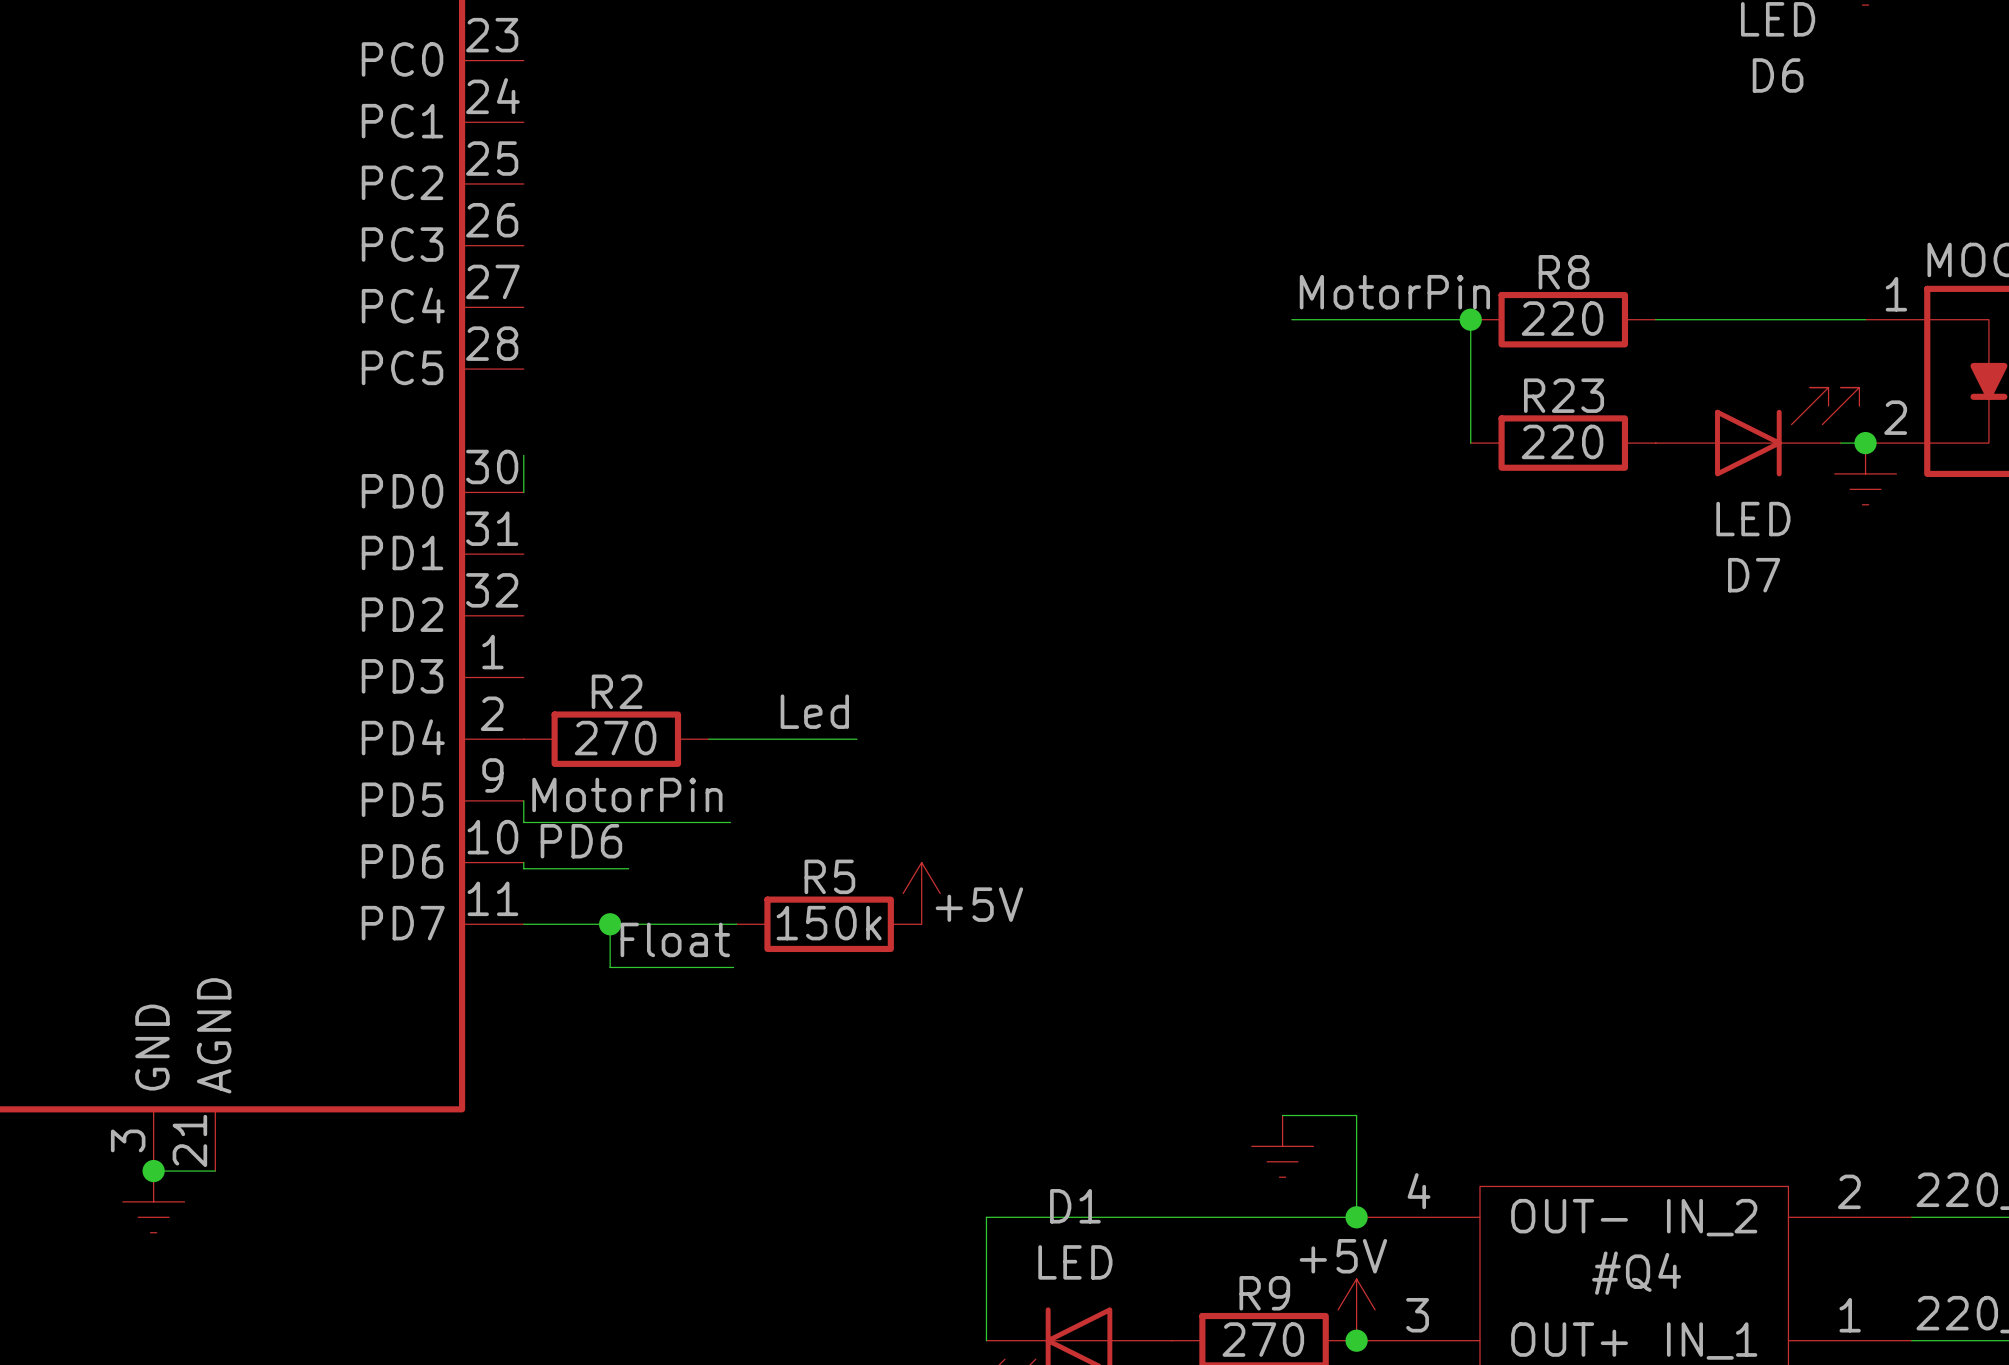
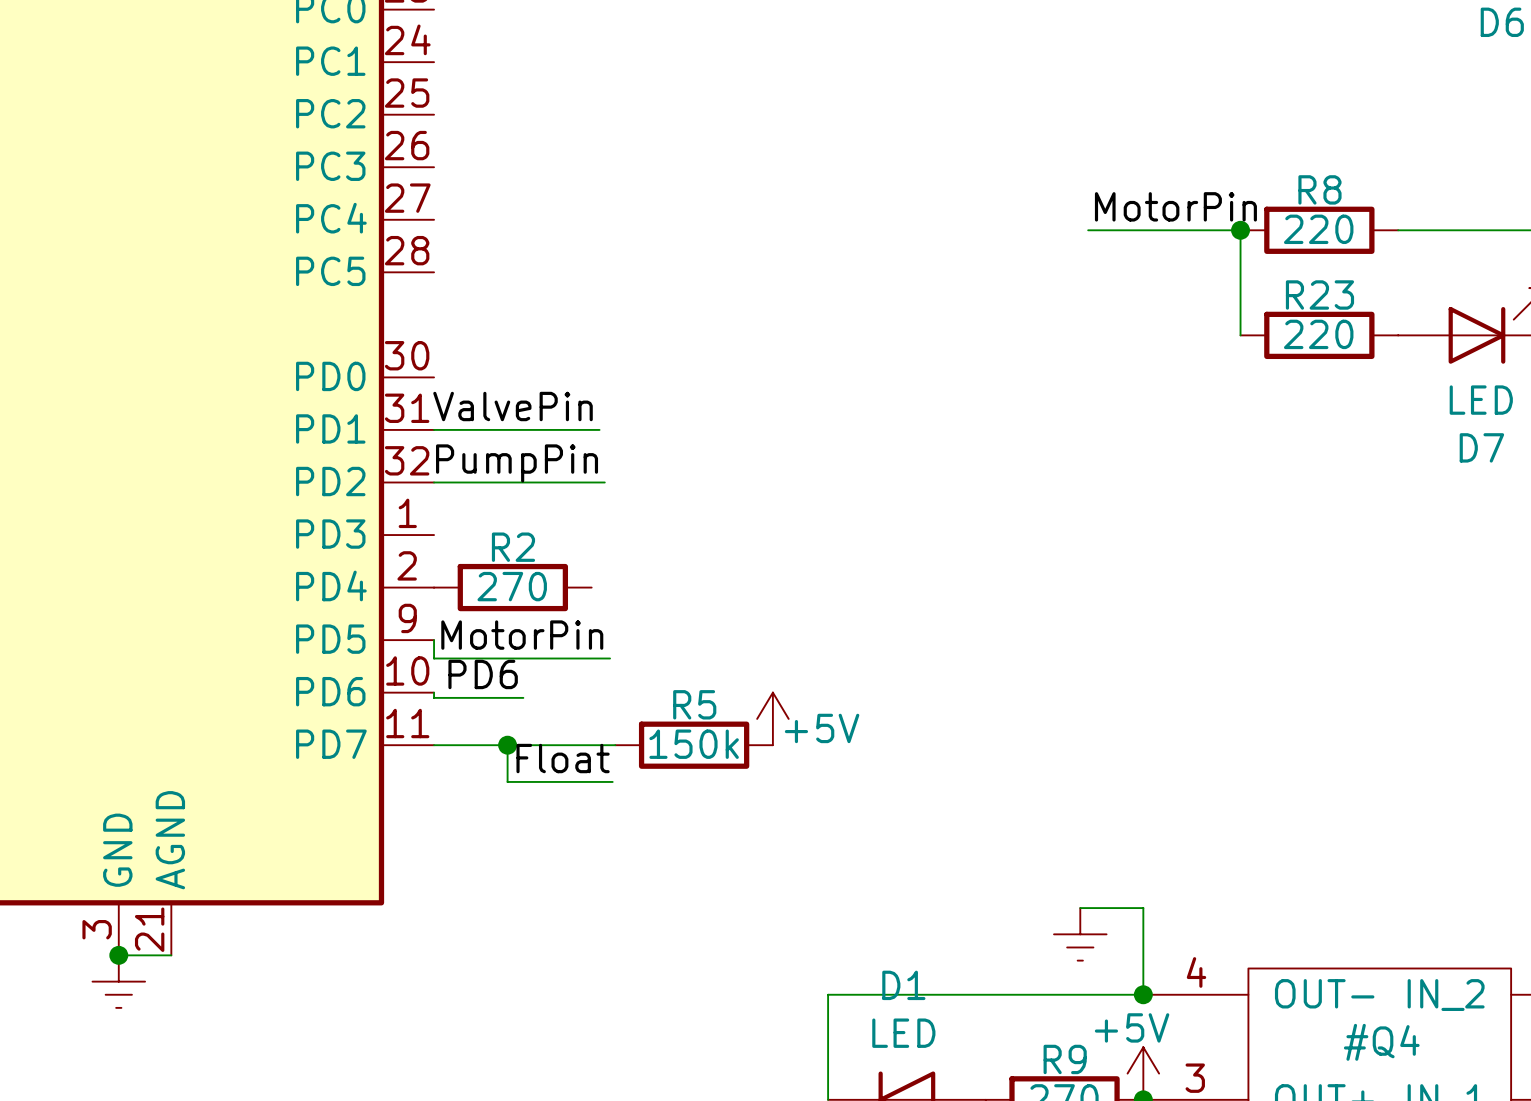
wire: (523, 455) (523, 492) -> none
label: none -> ValvePin (513, 406)
wire: none -> (434, 429) (599, 429)
label: none -> PumpPin (517, 463)
wire: none -> (434, 482) (604, 482)
label: Led (814, 711) -> none
wire: (708, 739) (856, 739) -> none

